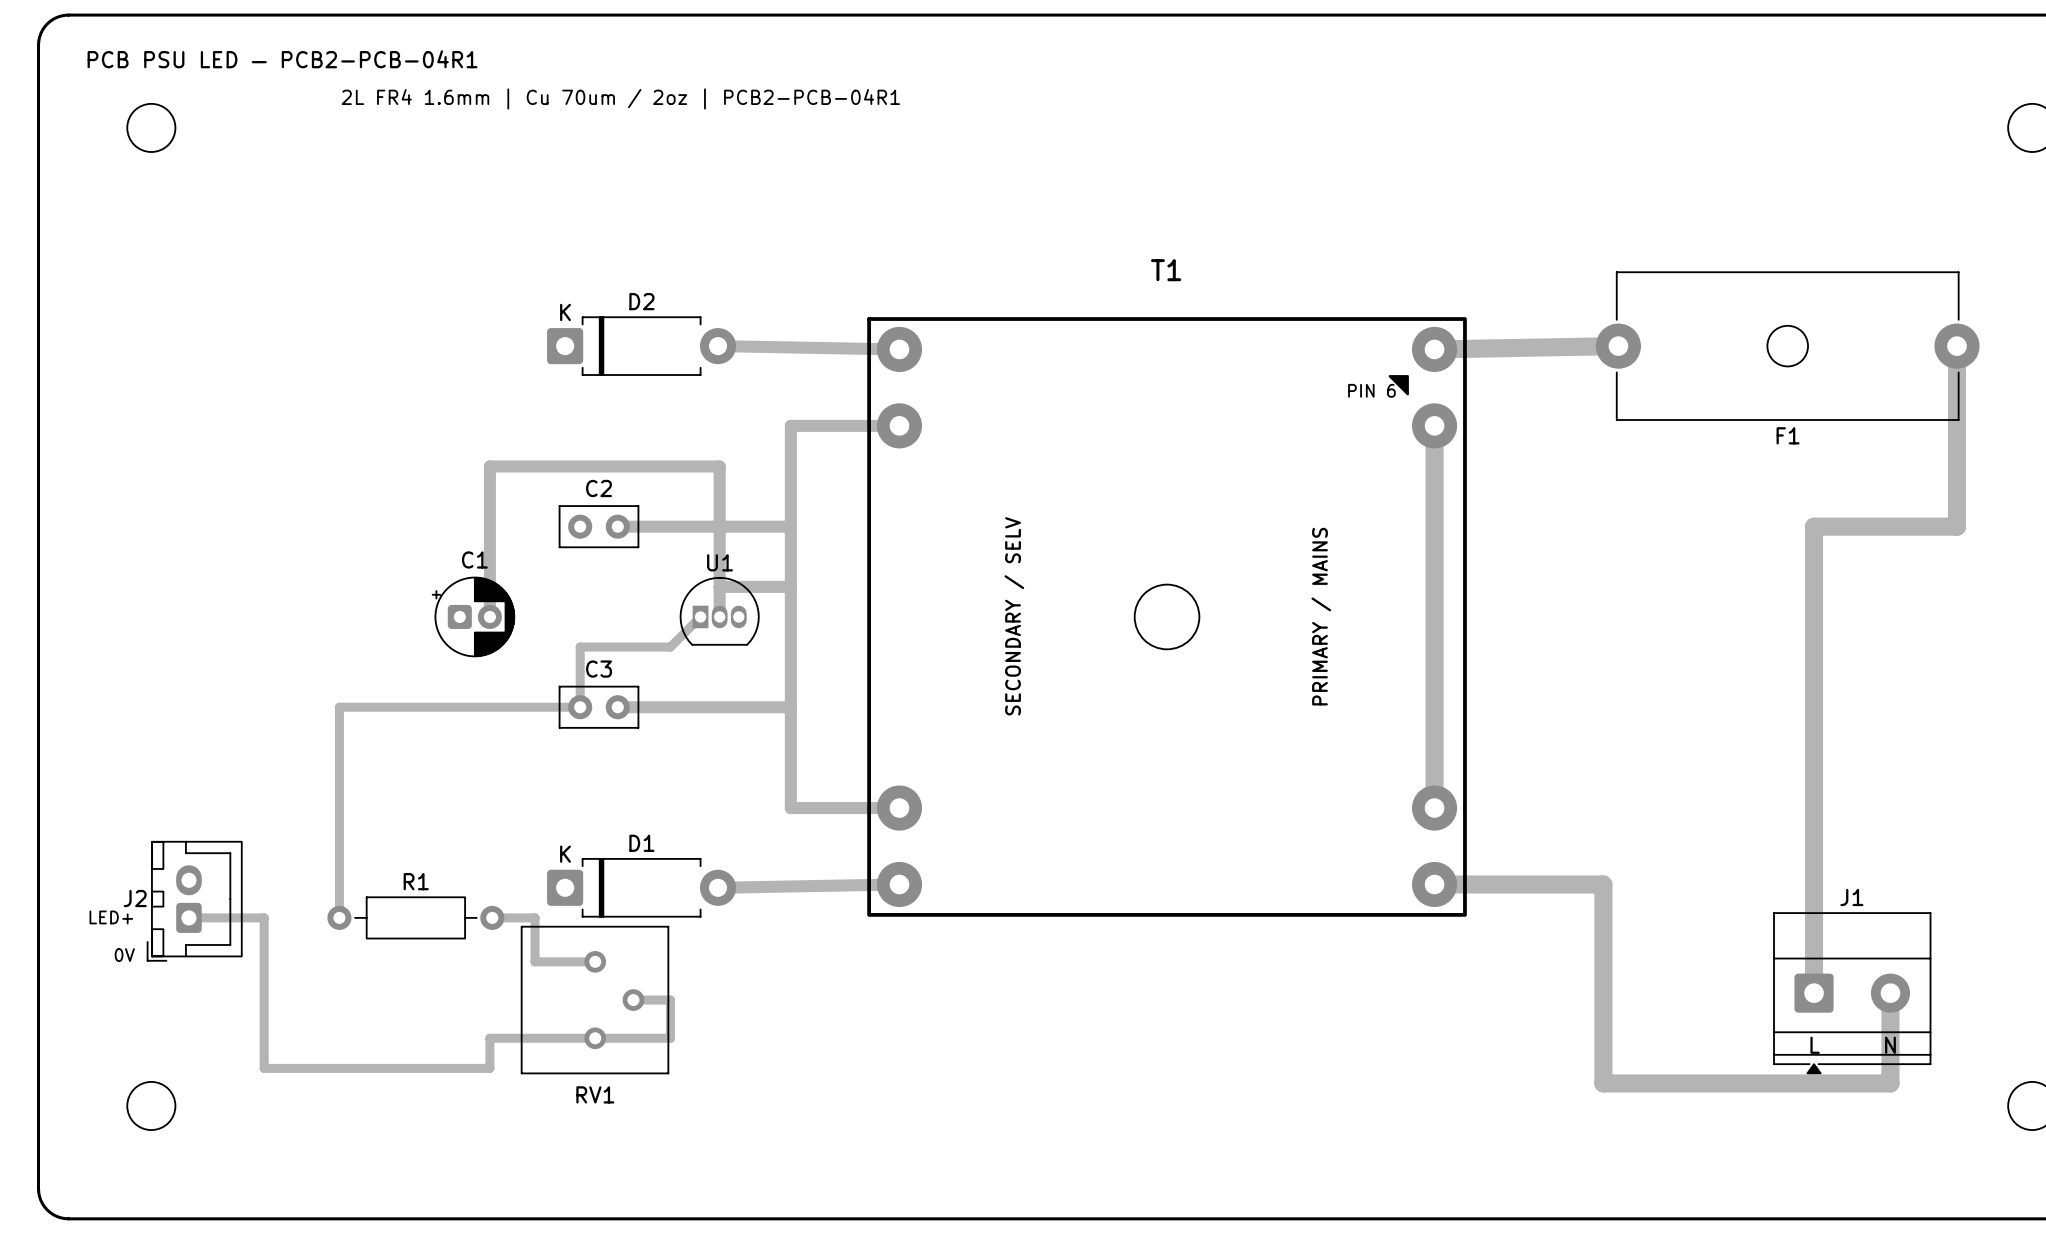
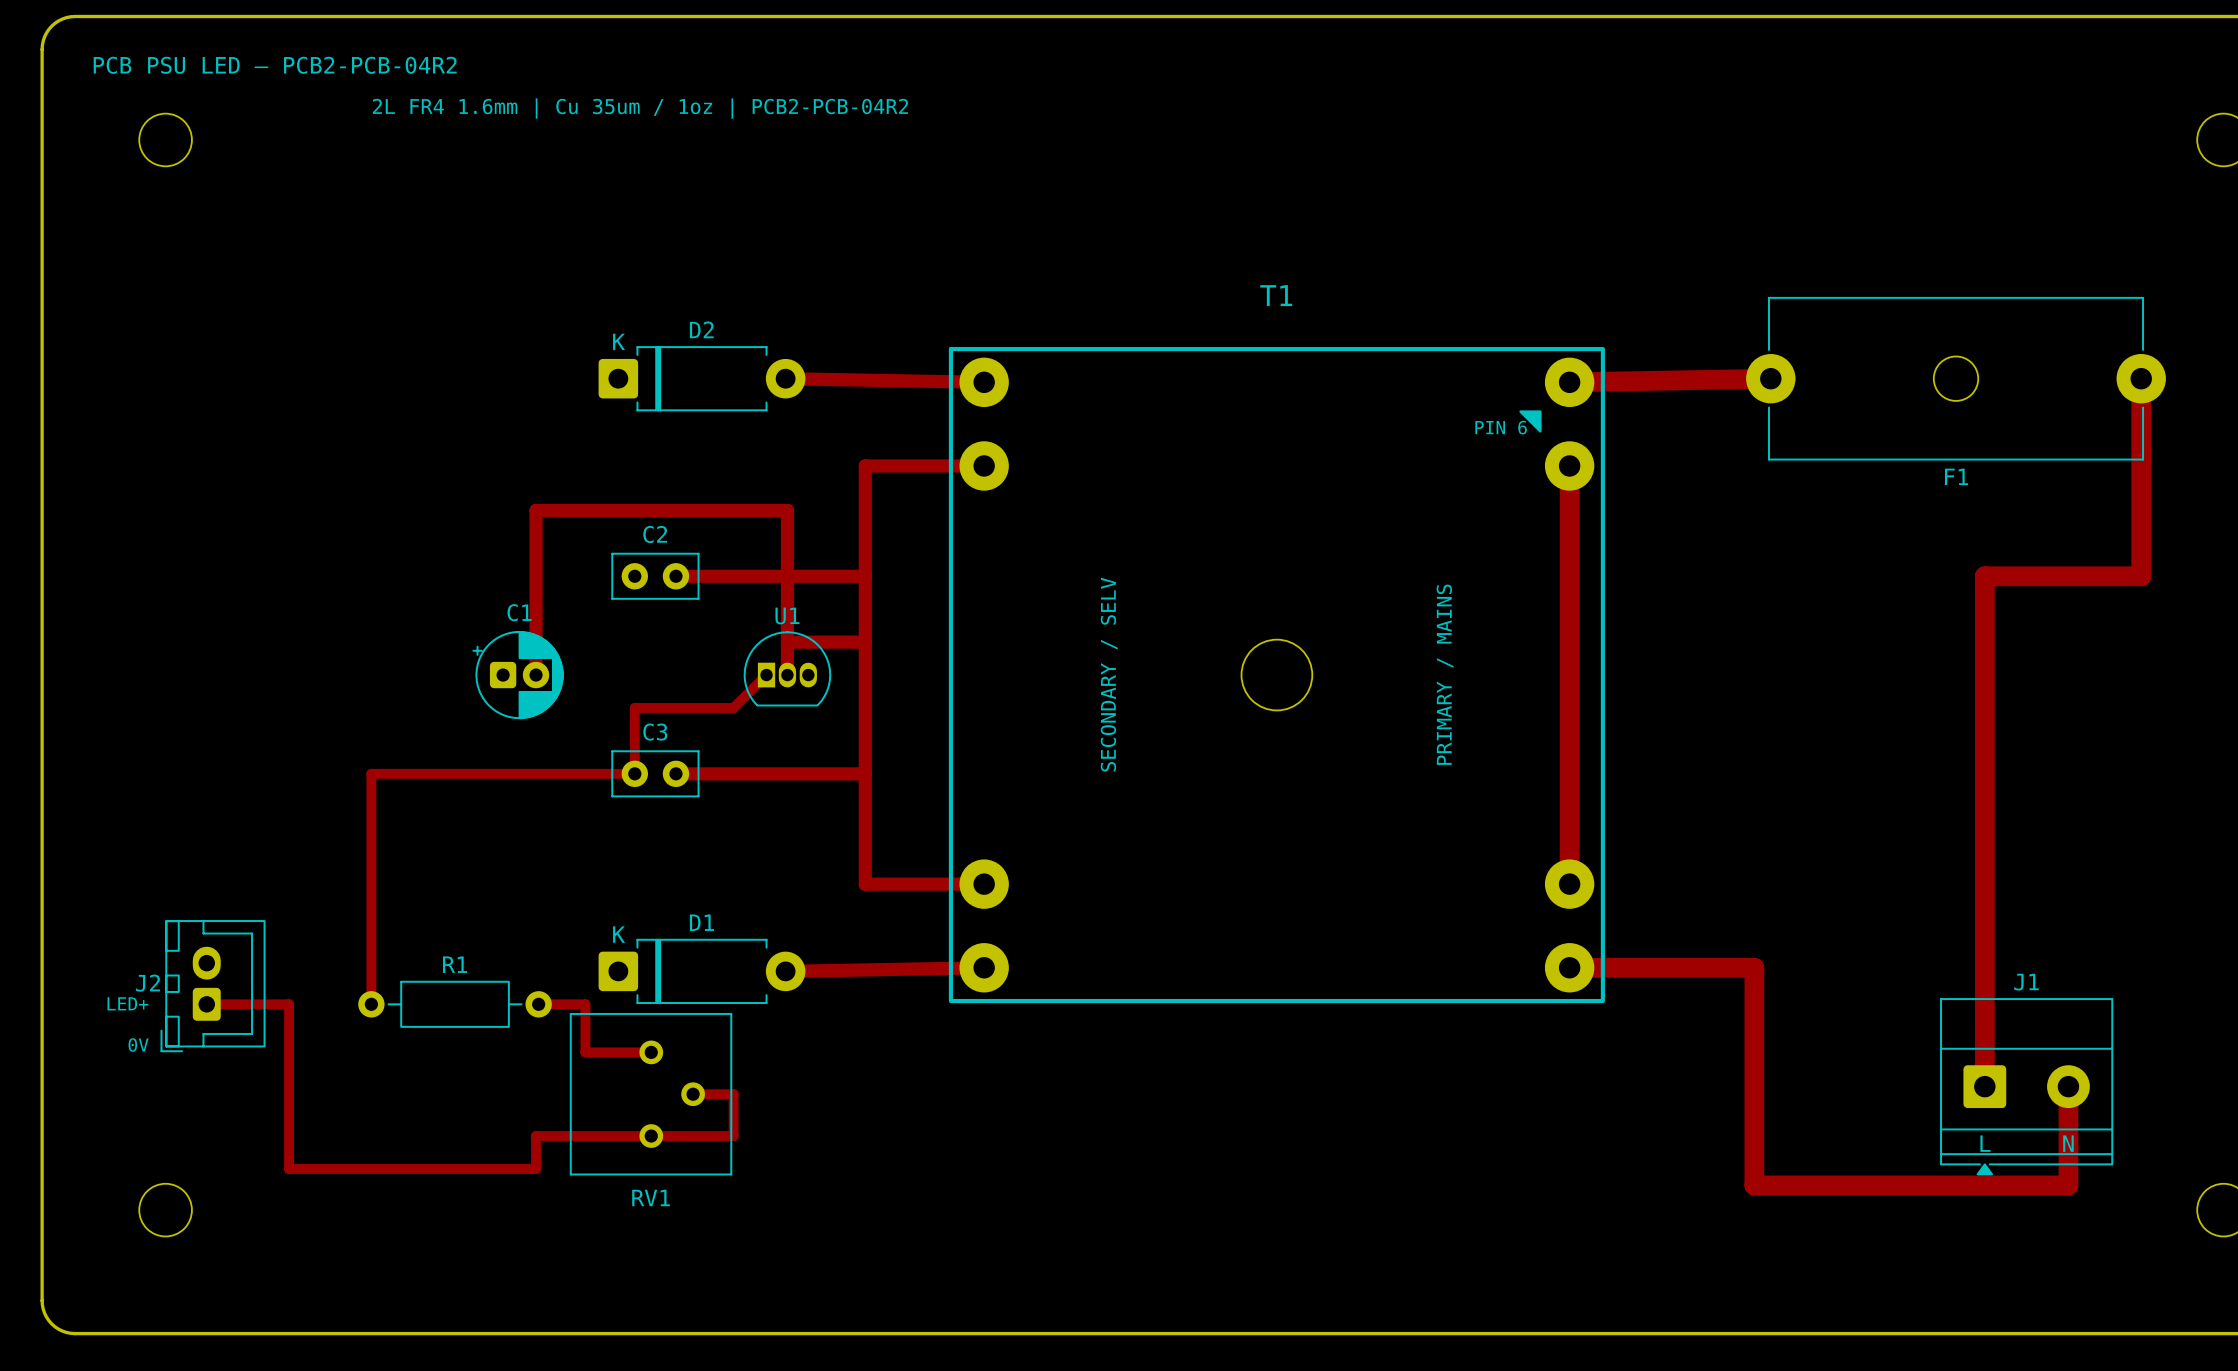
text: PCB PSU LED — PCB2-PCB-04R1 (282, 59) -> PCB PSU LED — PCB2-PCB-04R2 (275, 65)
text: 2L FR4 1.6mm | Cu 70um / 2oz | PCB2-PCB-04R1 (620, 98) -> 2L FR4 1.6mm | Cu 35um / 1oz | PCB2-PCB-04R2 (640, 108)

